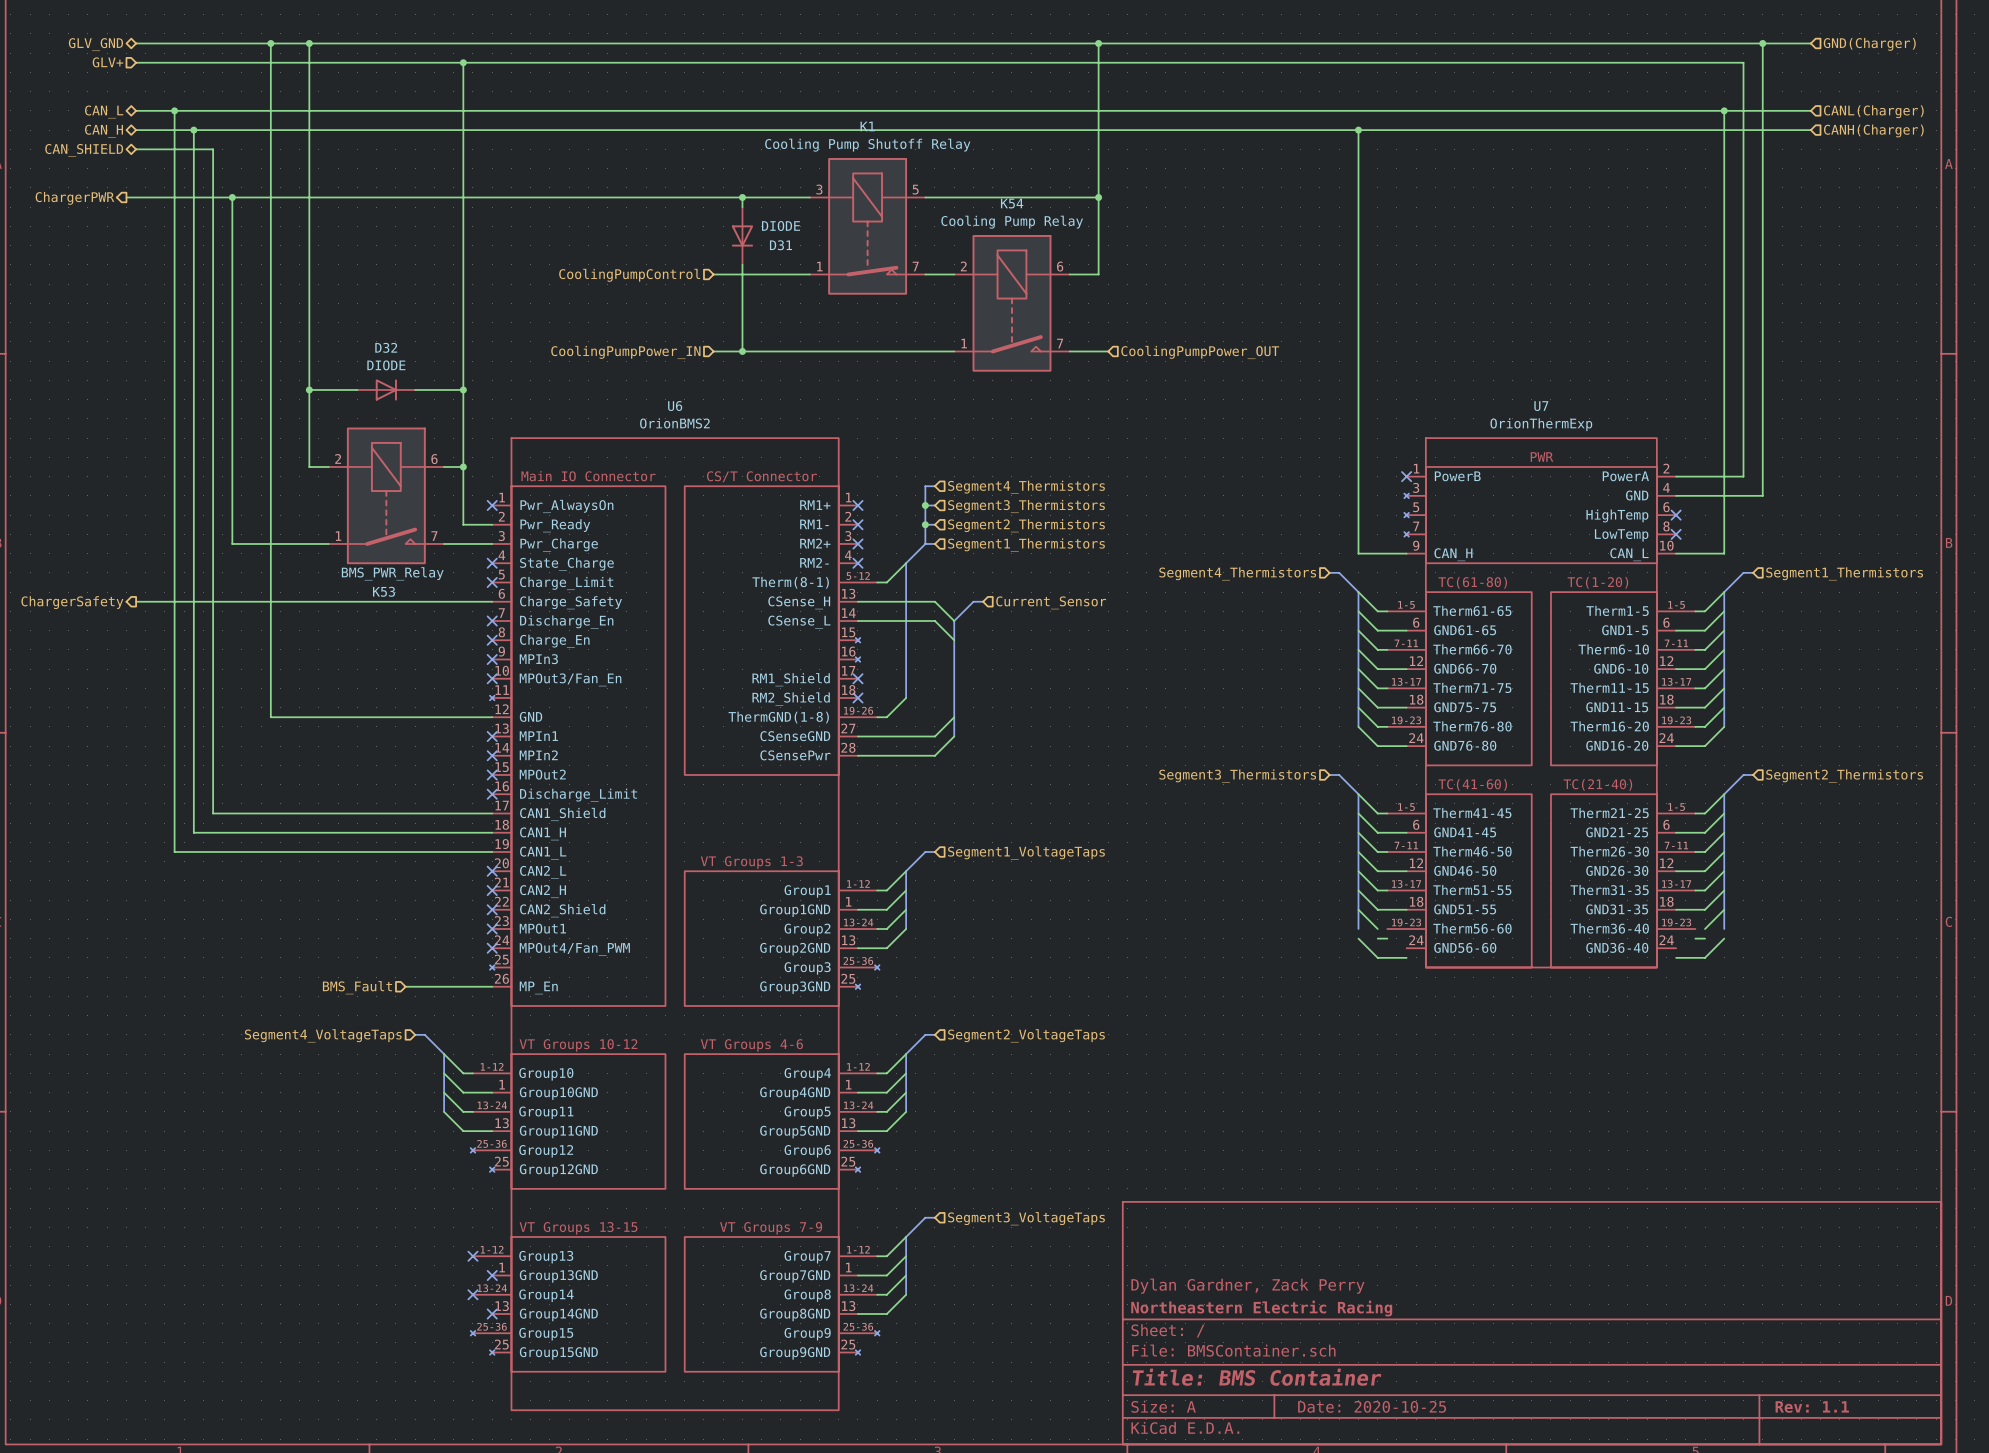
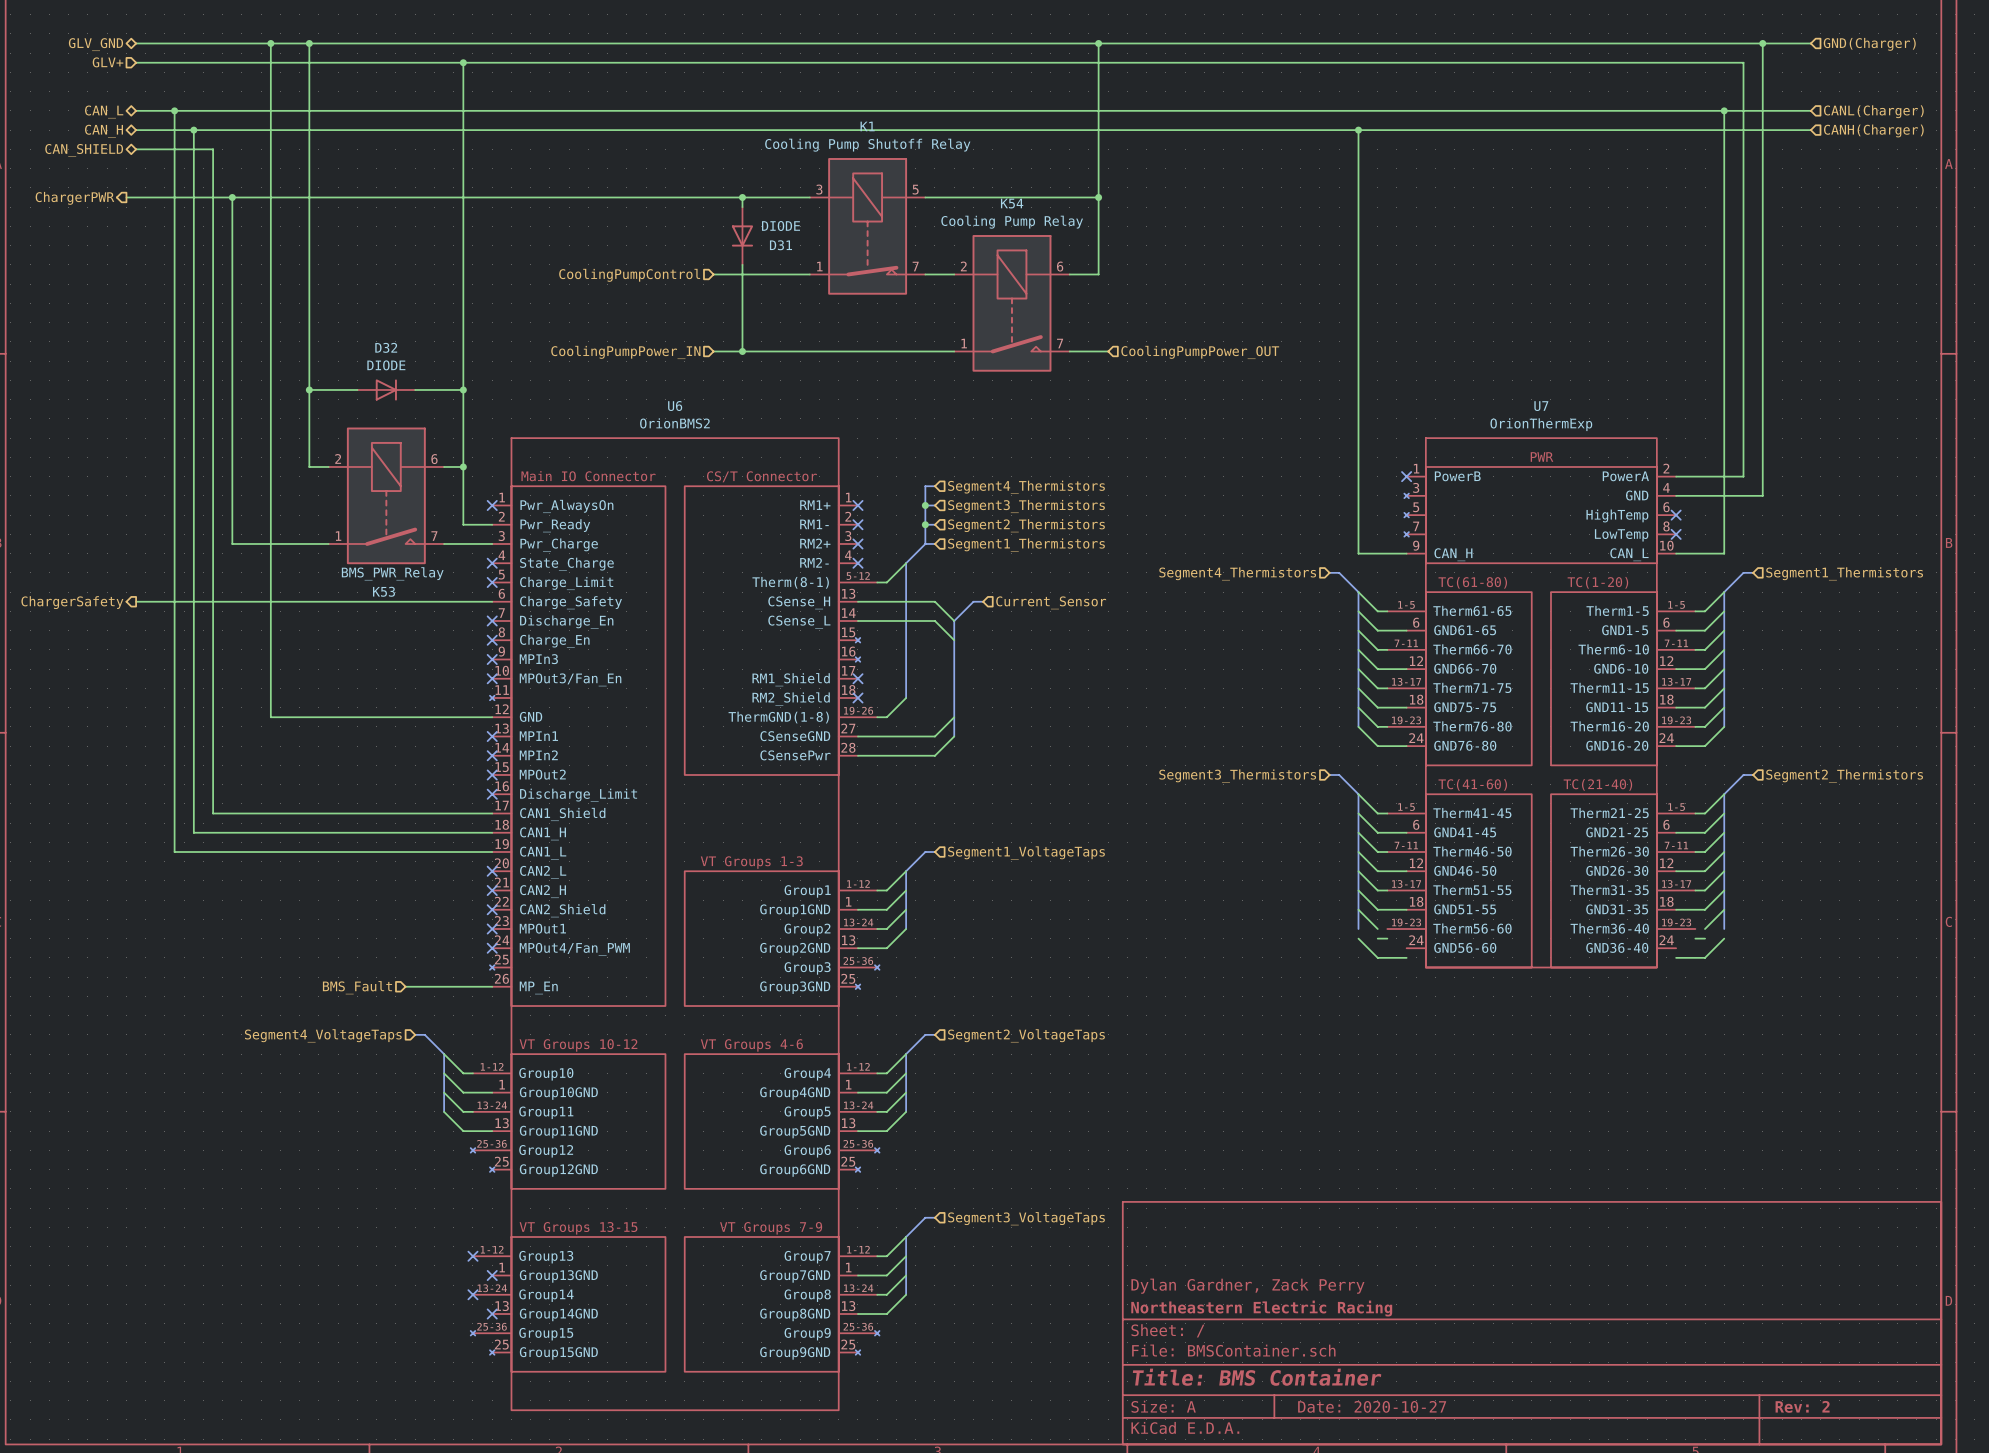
title block: Date: 2020-10-25 (1372, 1406) -> Date: 2020-10-27 (1372, 1406)
title block: Rev: 1.1 (1812, 1406) -> Rev: 2 (1802, 1406)

